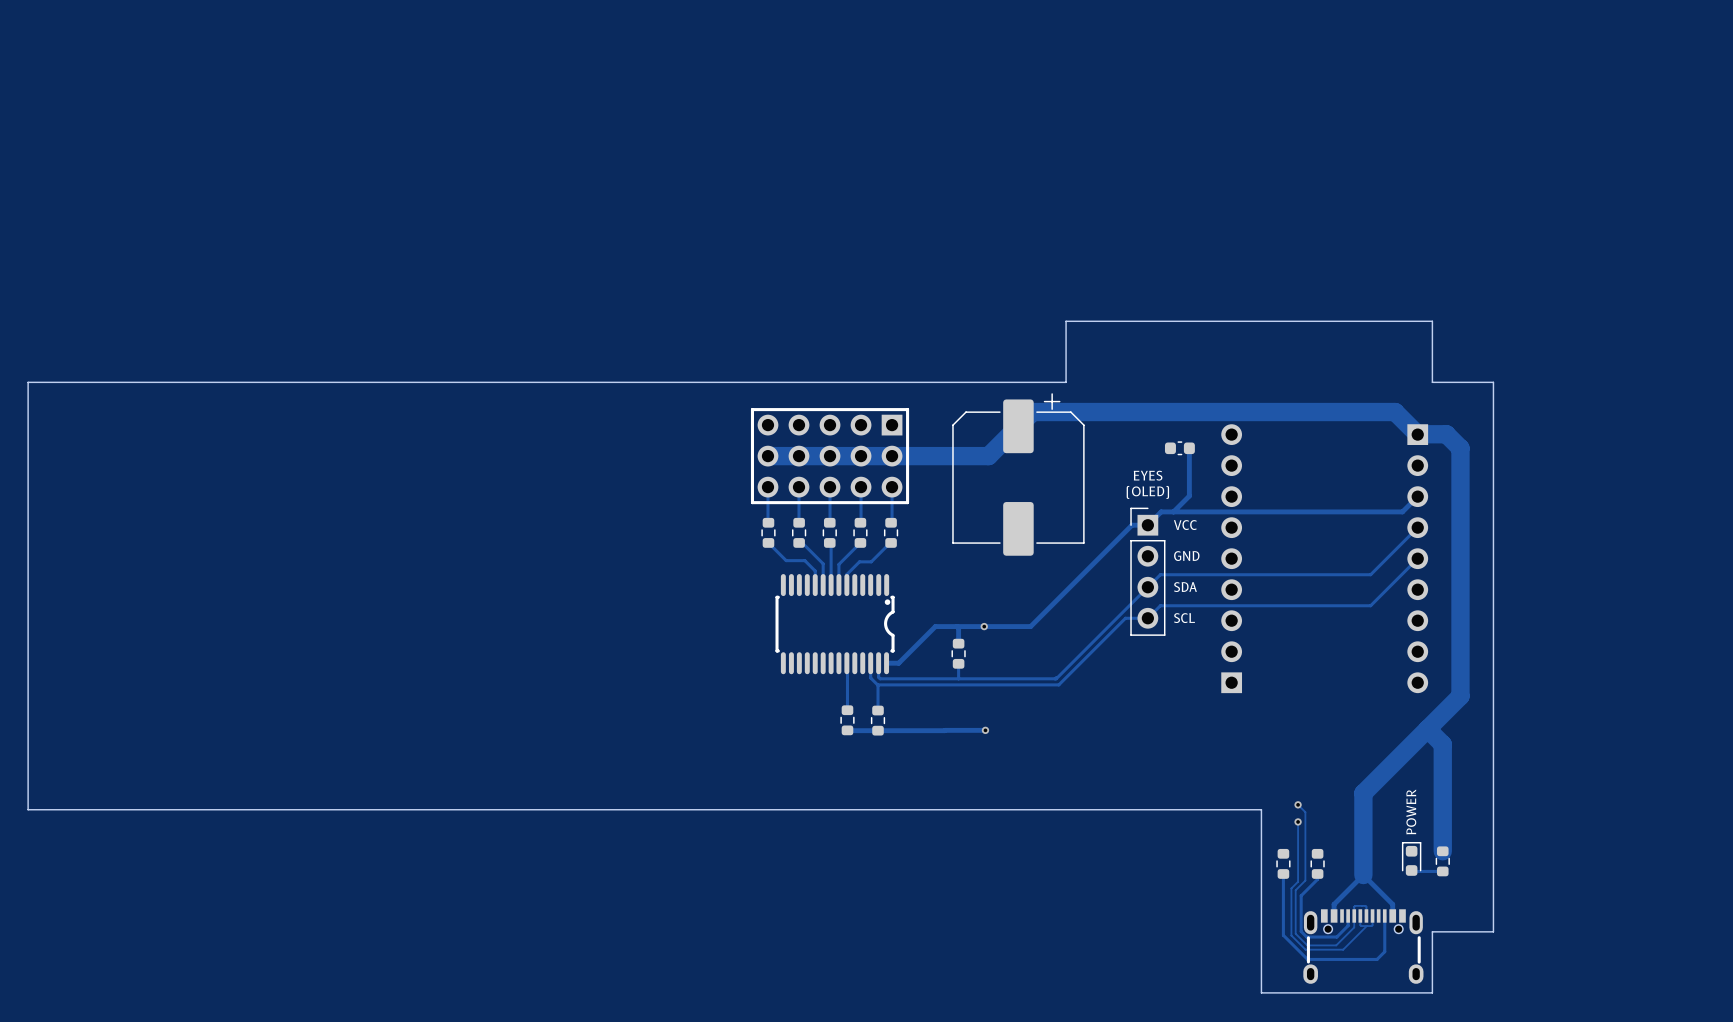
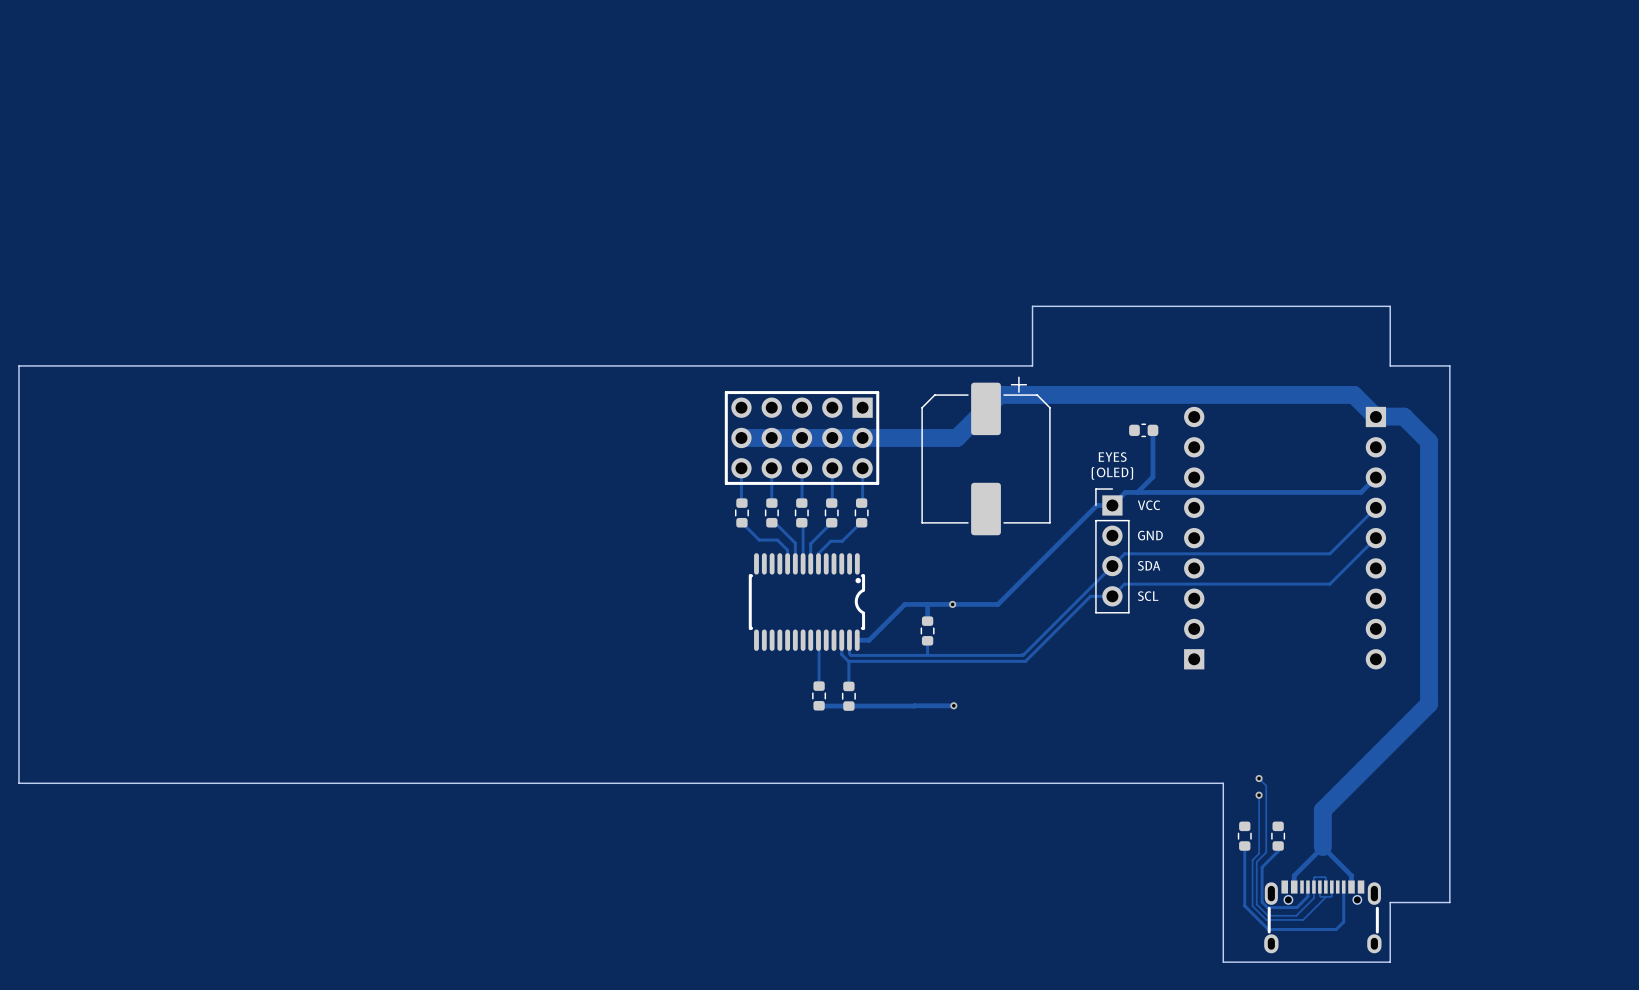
track: (1460, 448) (1460, 696) (1363, 793) (1363, 837) -> (1417, 430) (1428, 441) (1428, 704) (1322, 810)
track: (1427, 729) (1442, 744) (1442, 851) -> none
text: POWER (1411, 811) -> none
part: (1411, 858) -> none
part: (1442, 861) -> none
track: (1411, 870) (1442, 871) -> none

